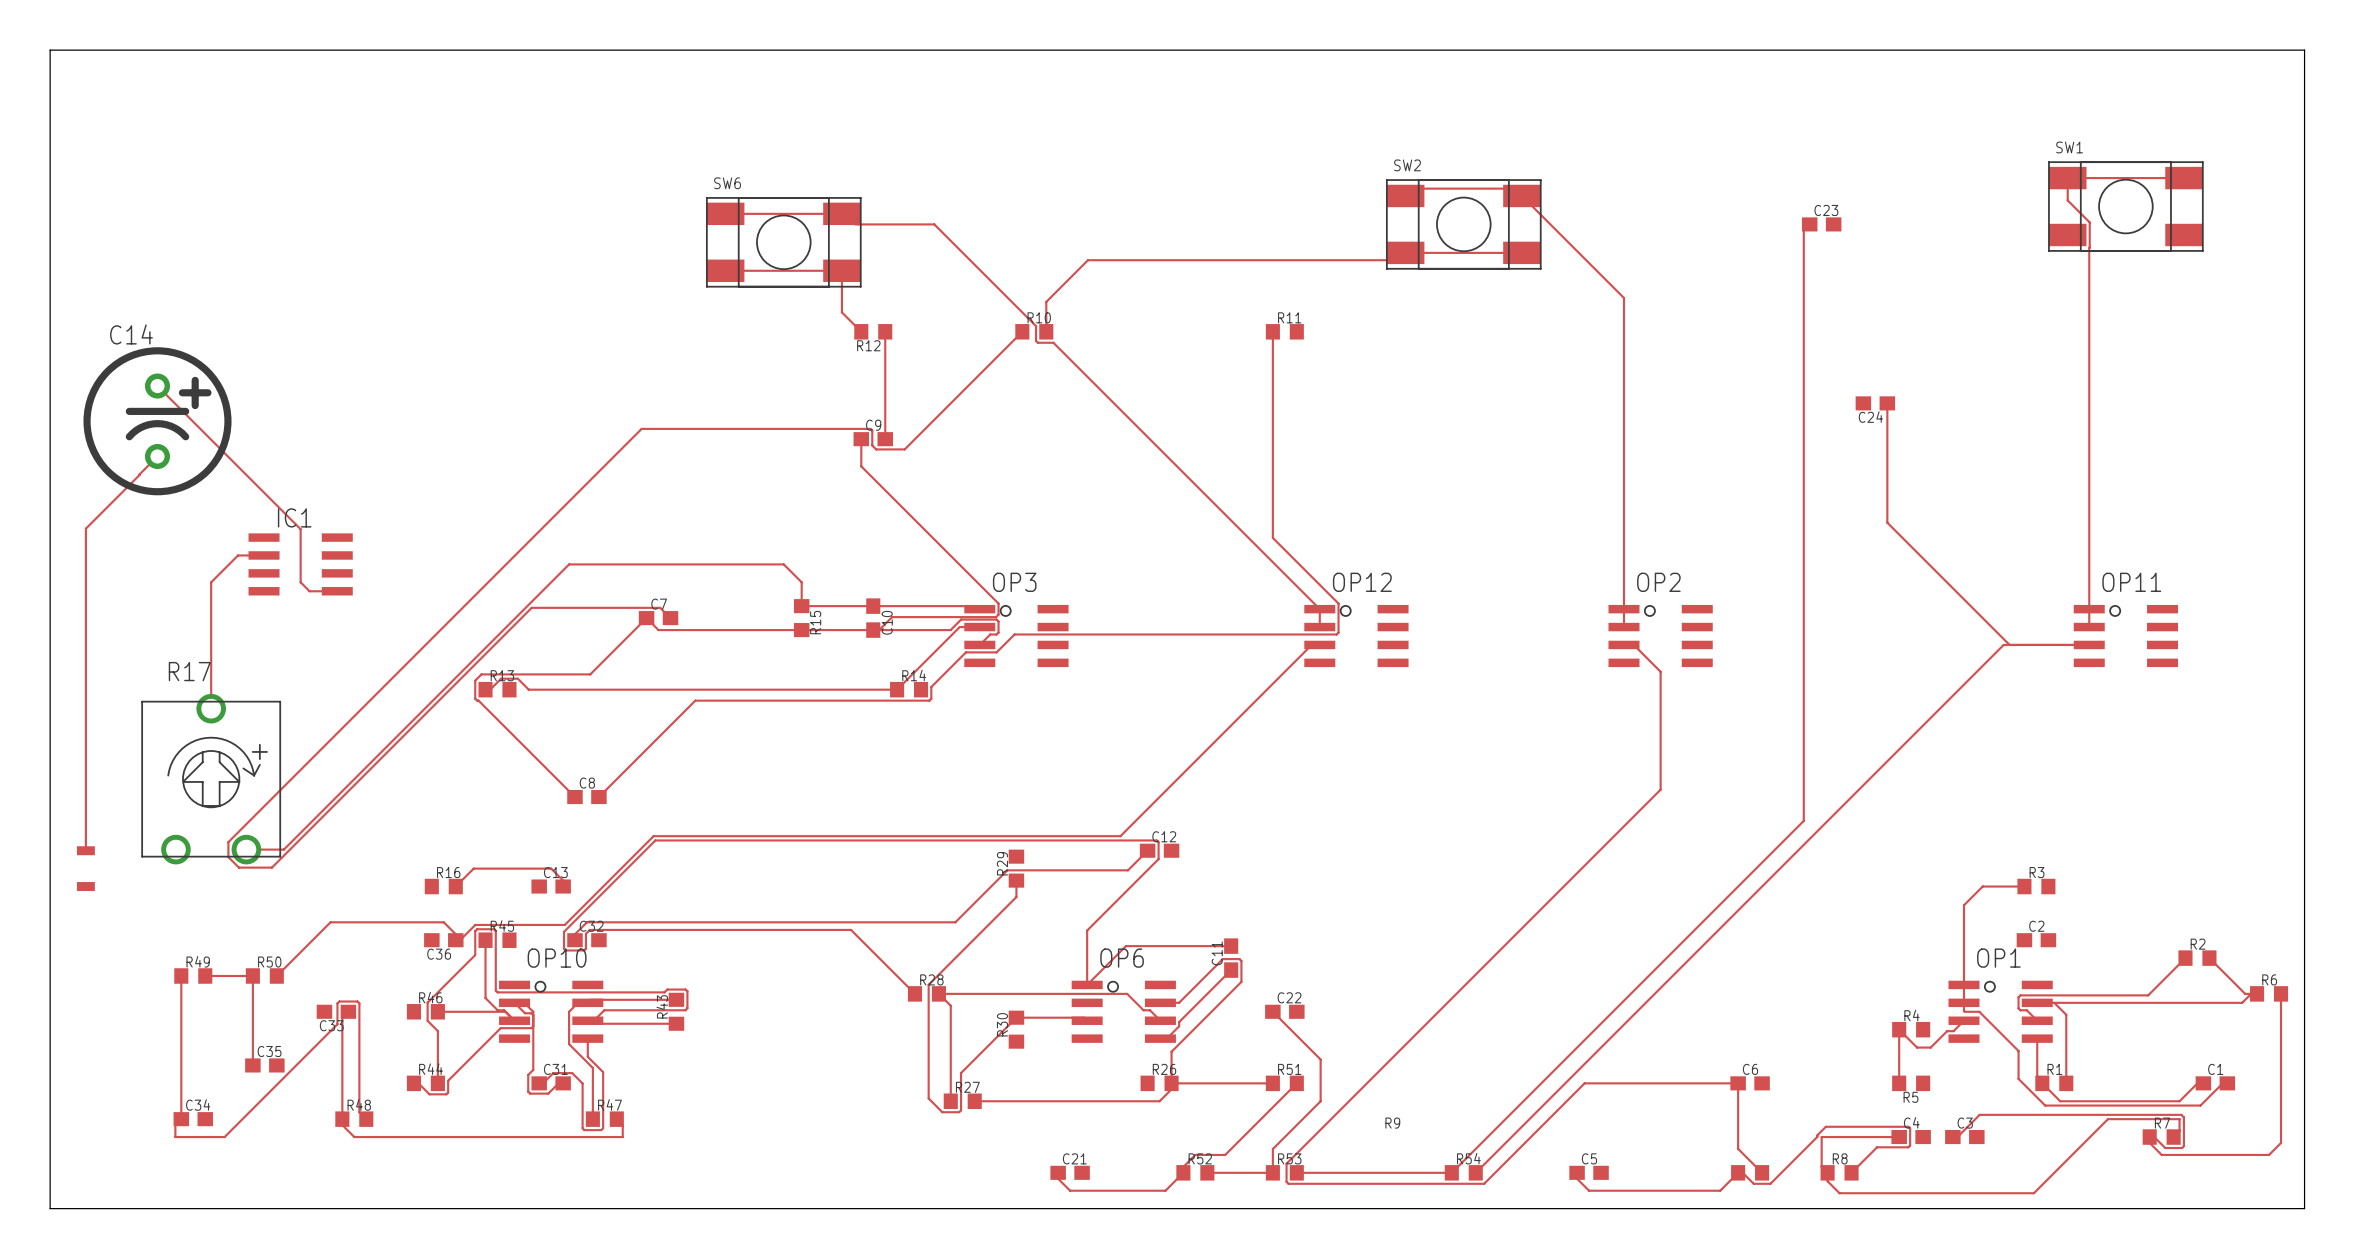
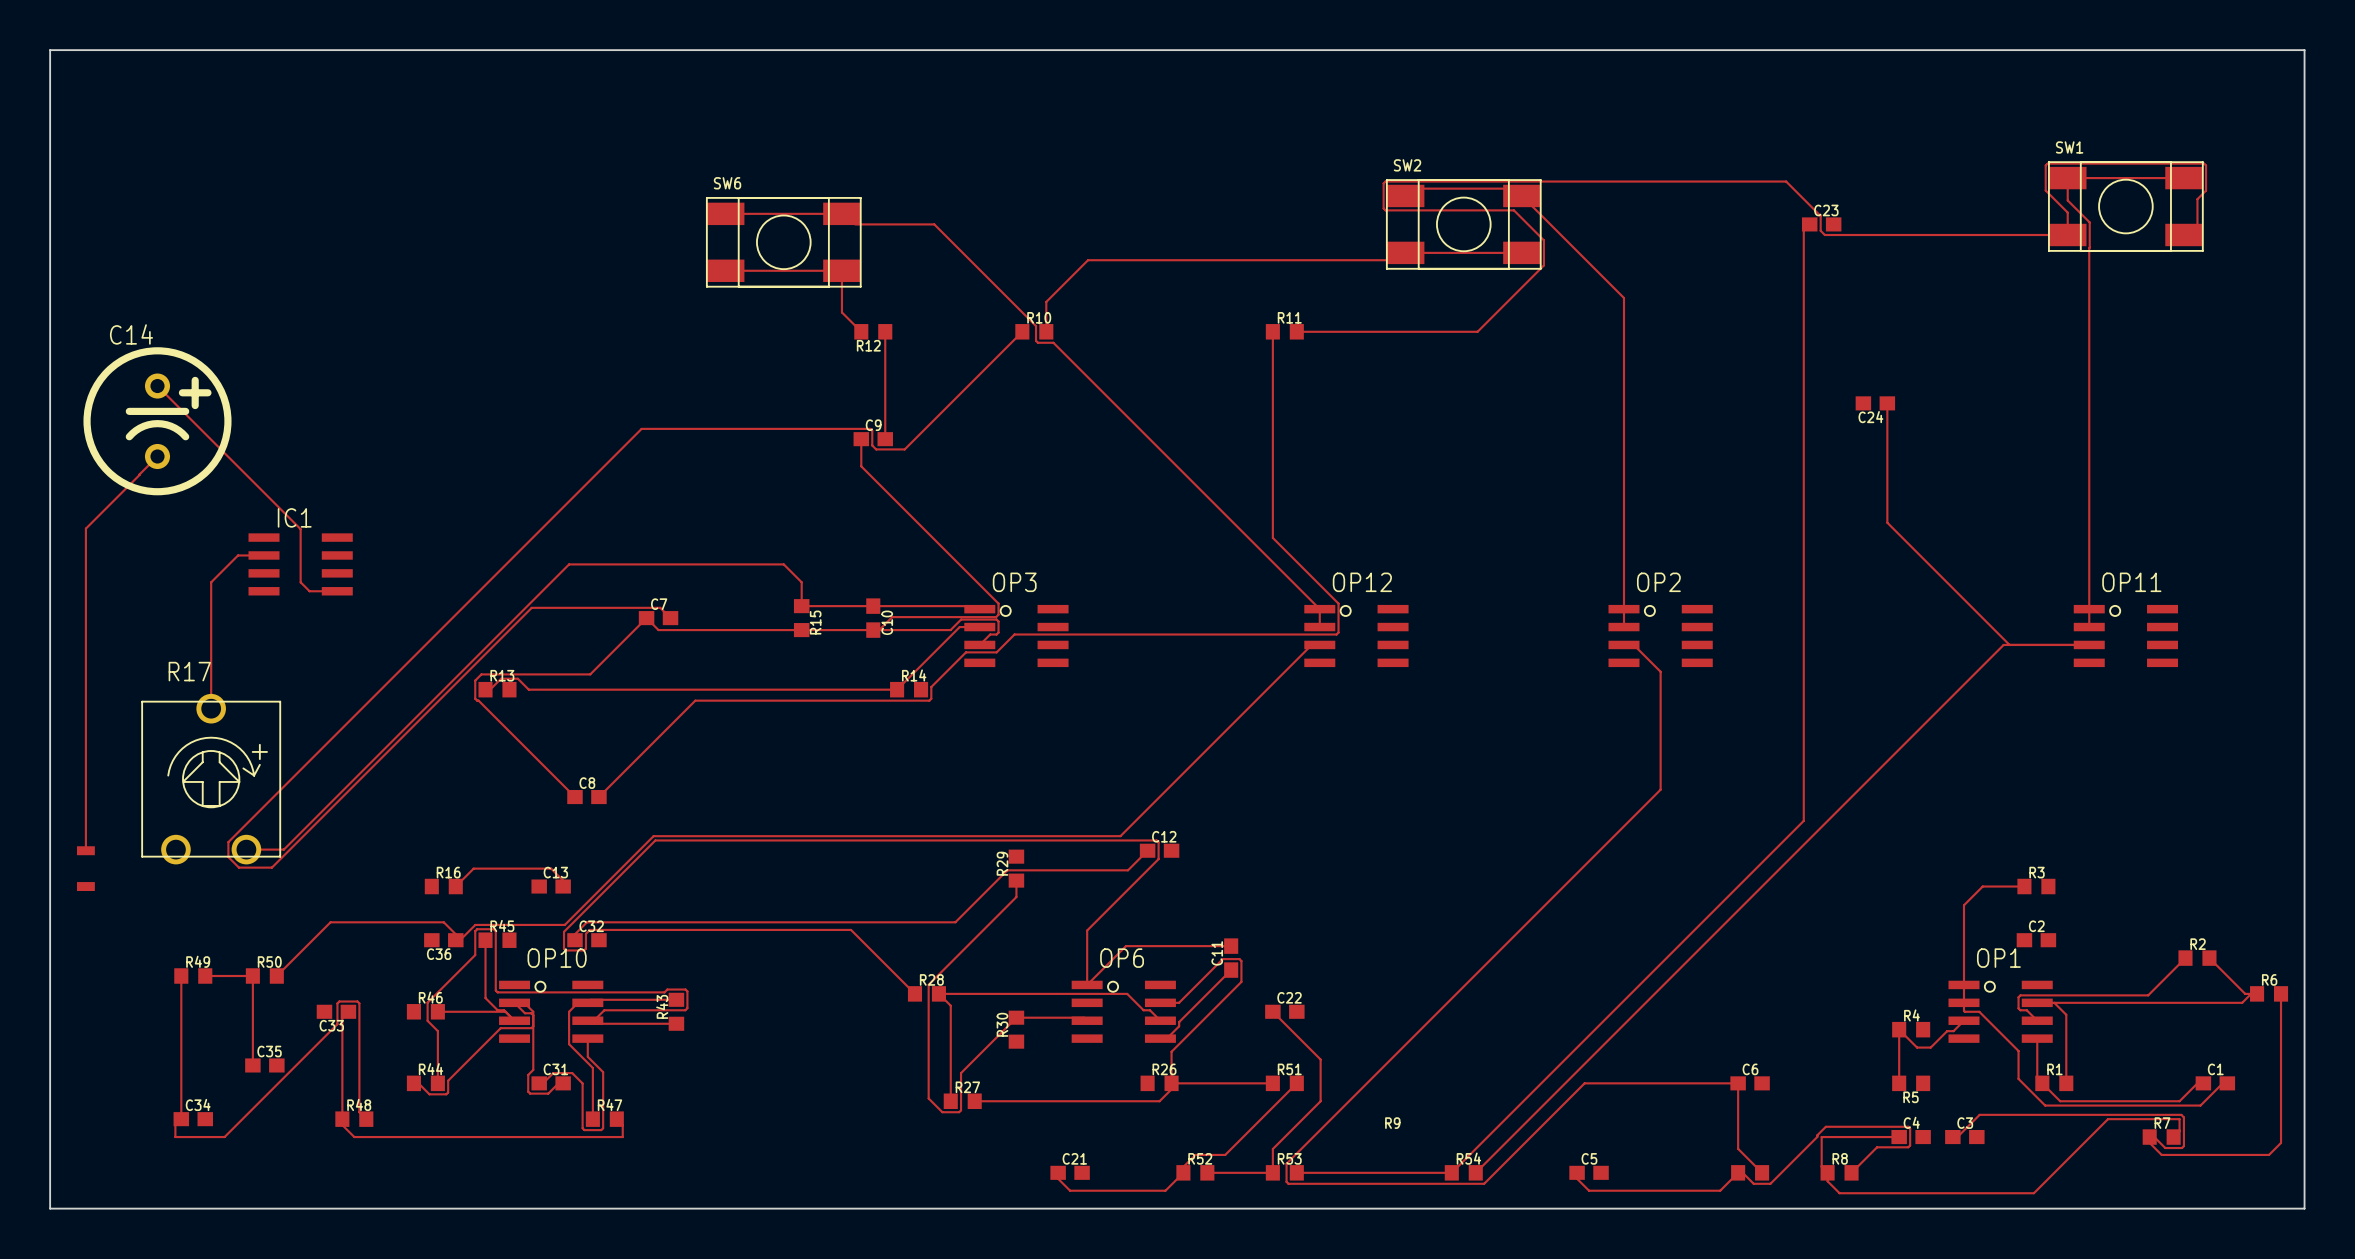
track: none -> (2197, 224) (2197, 199) (2206, 190) (2206, 165) (2204, 163) (2047, 163) (2045, 165) (2045, 190) (2067, 212) (2067, 234) (1824, 234) (1820, 230) (1820, 216) (1786, 181) (1385, 181) (1383, 183) (1383, 208) (1385, 210) (1513, 210) (1543, 240) (1543, 265) (1477, 331) (1296, 331)

